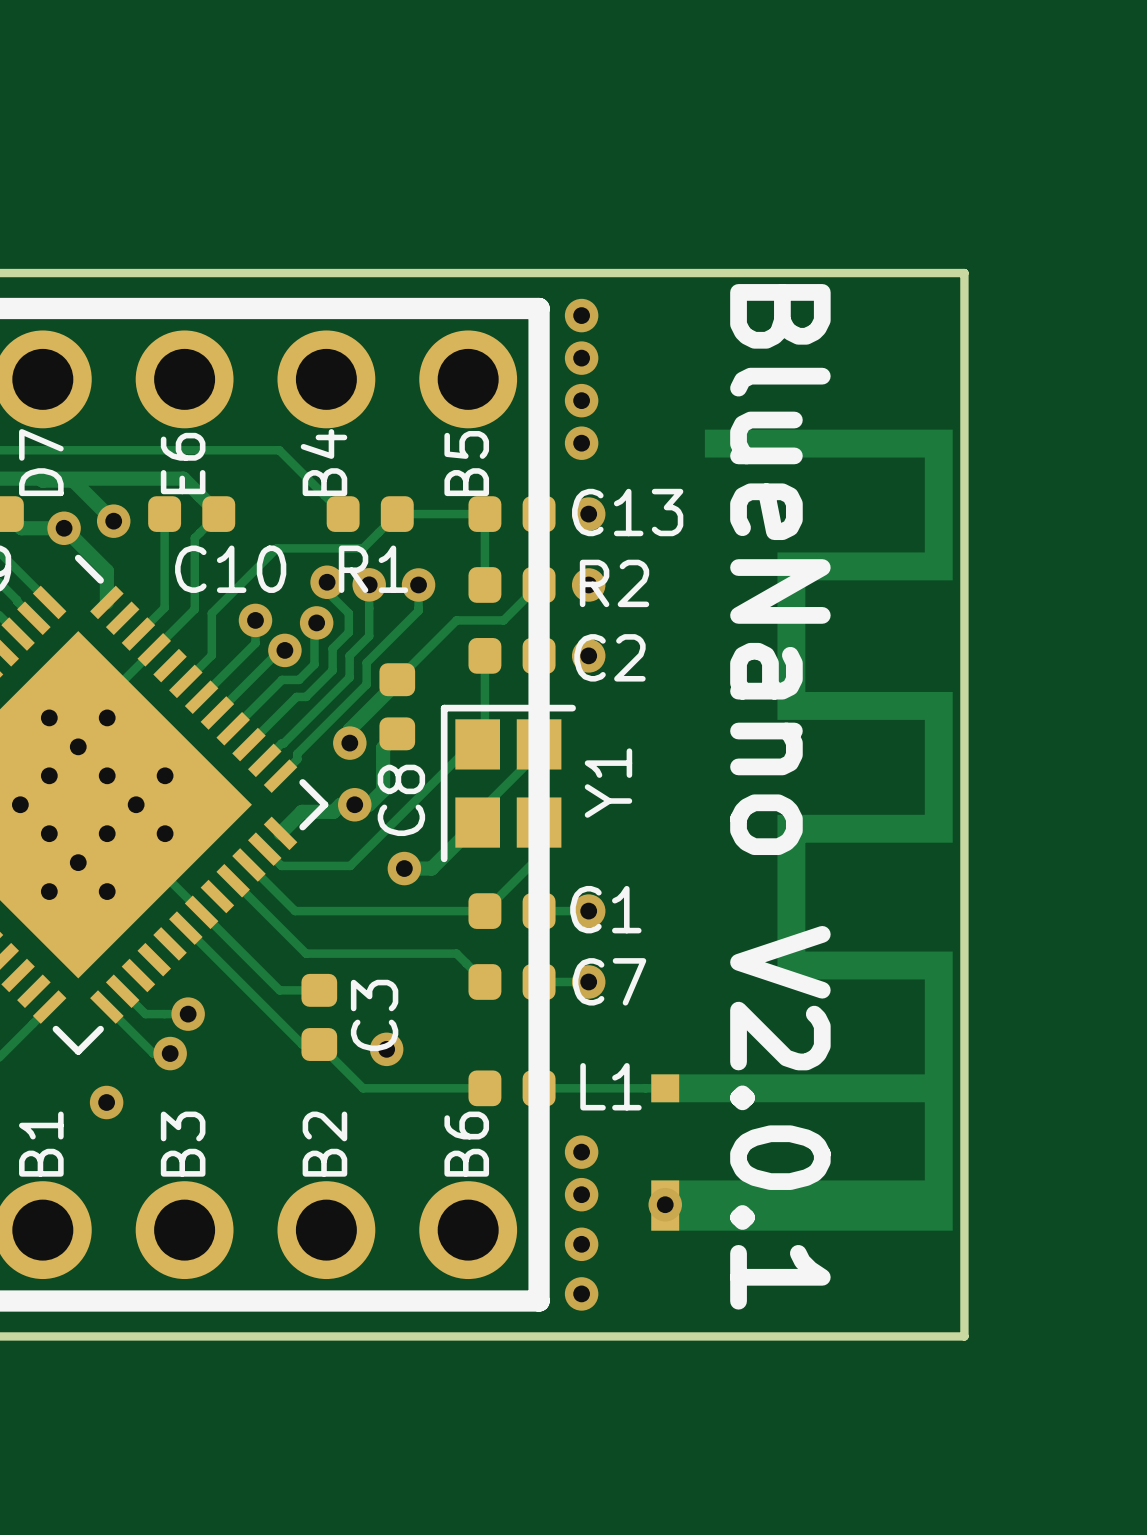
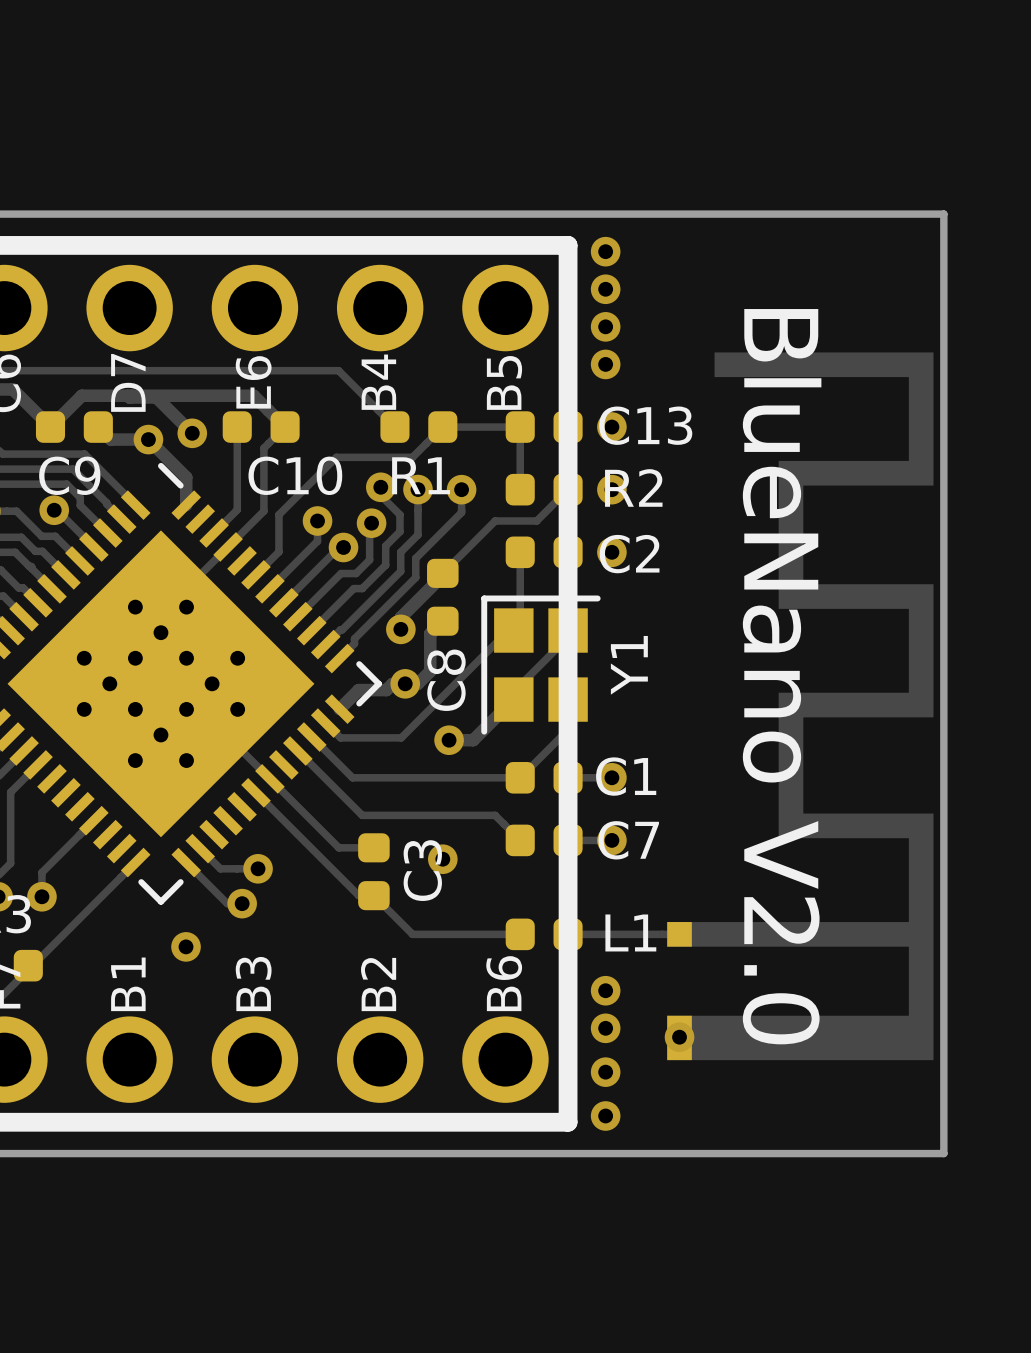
text: BlueNano V2.0.1 (780, 796) -> BlueNano V2.0 (782, 676)
via position: (386, 1049) -> (442, 859)

